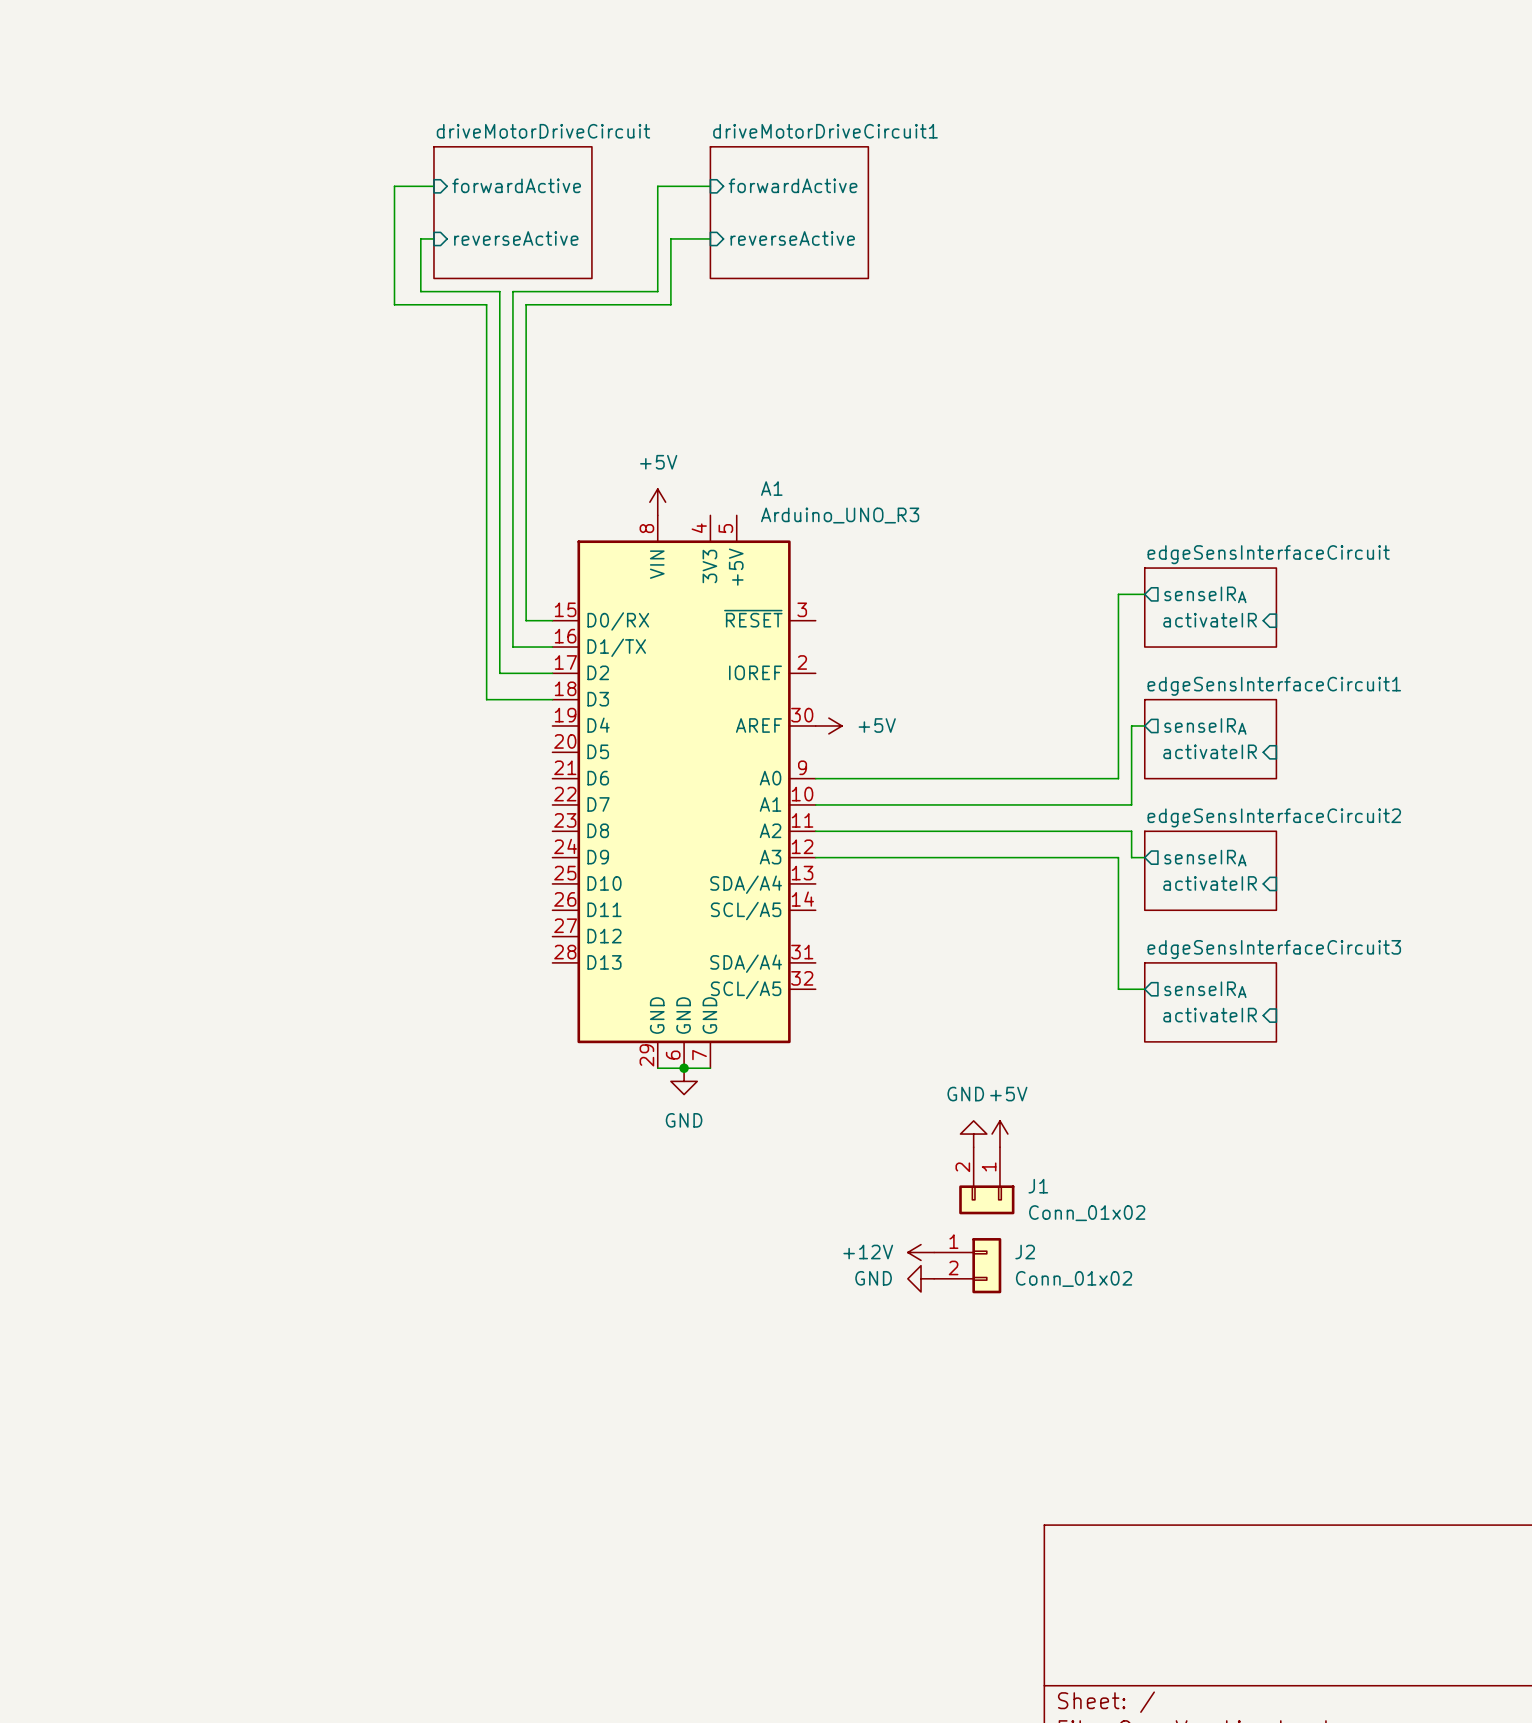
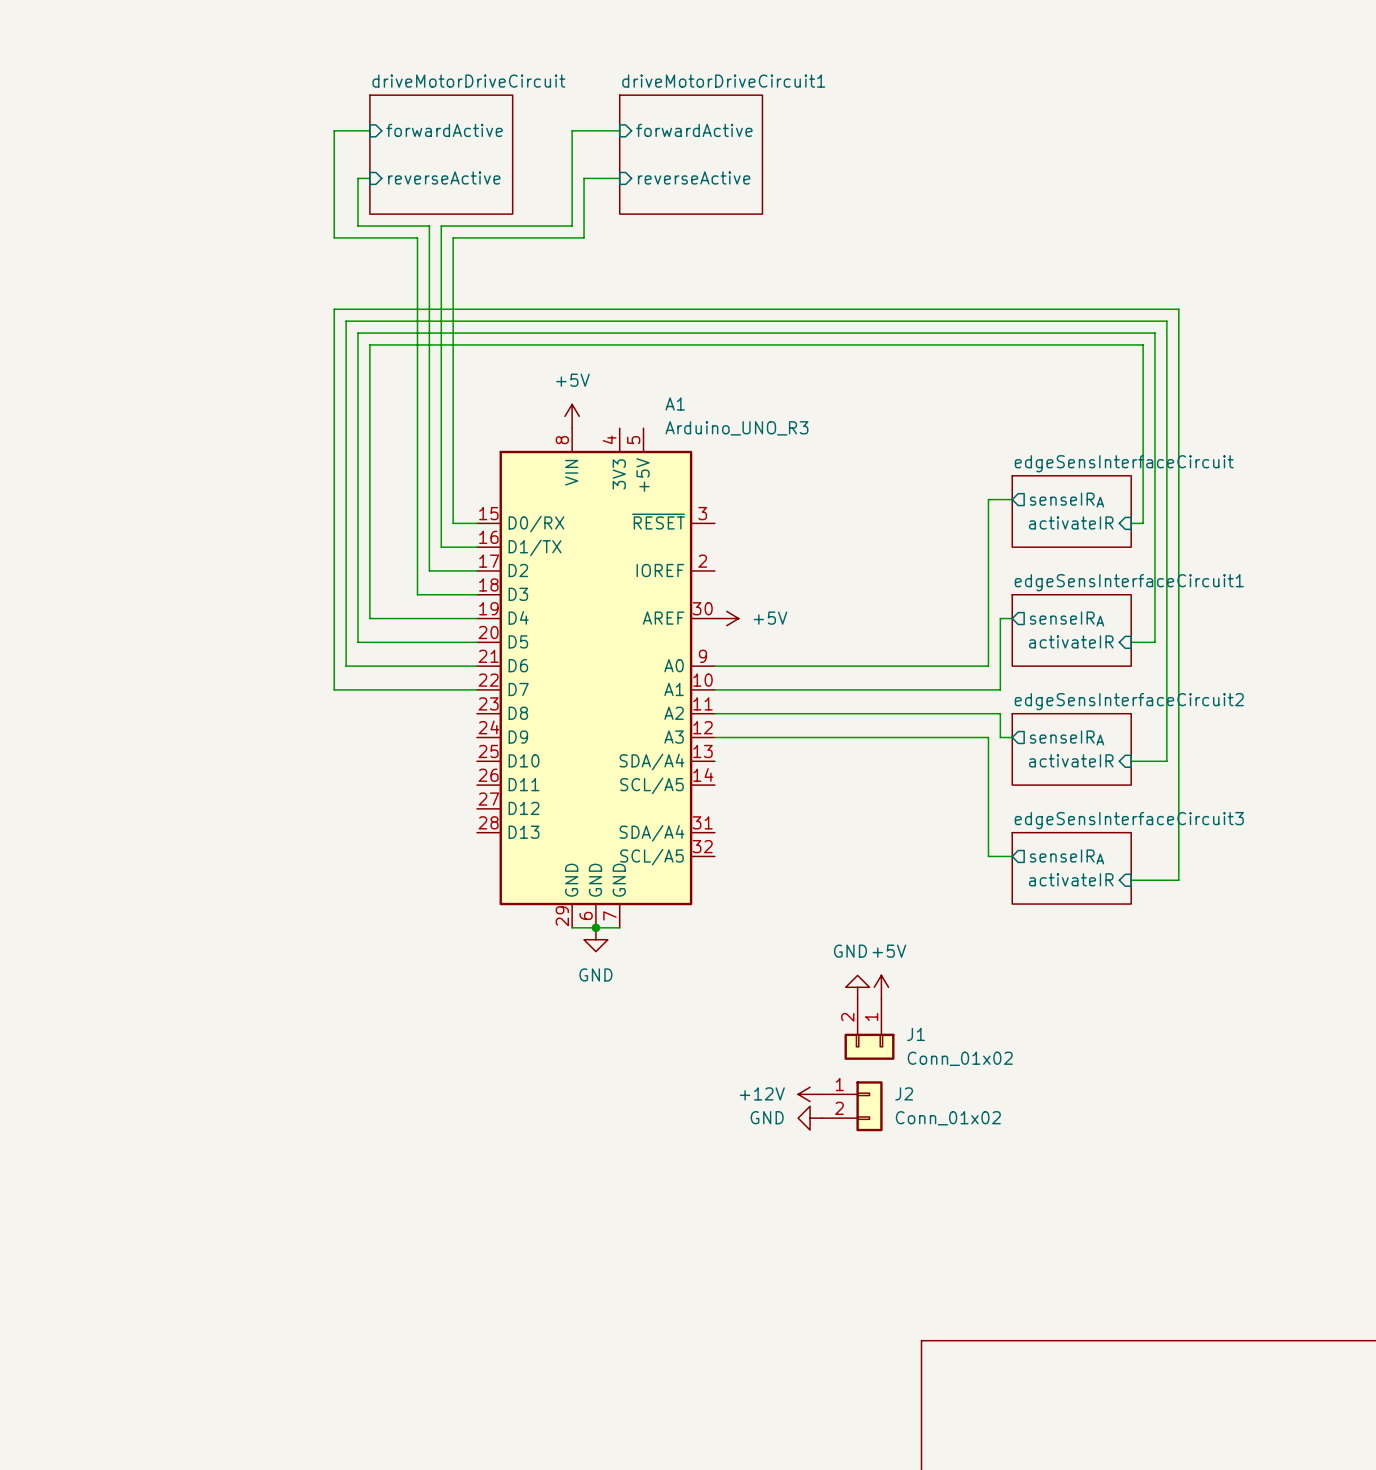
wire: none -> (1131, 523) (1143, 523) (1143, 344) (369, 344) (369, 618) (476, 618)
wire: none -> (476, 642) (358, 642) (358, 333) (1154, 333) (1154, 642) (1131, 642)
wire: none -> (476, 666) (346, 666) (346, 321) (1166, 321) (1166, 761) (1131, 761)
wire: none -> (476, 689) (334, 689) (334, 309) (1178, 309) (1178, 880) (1131, 880)

